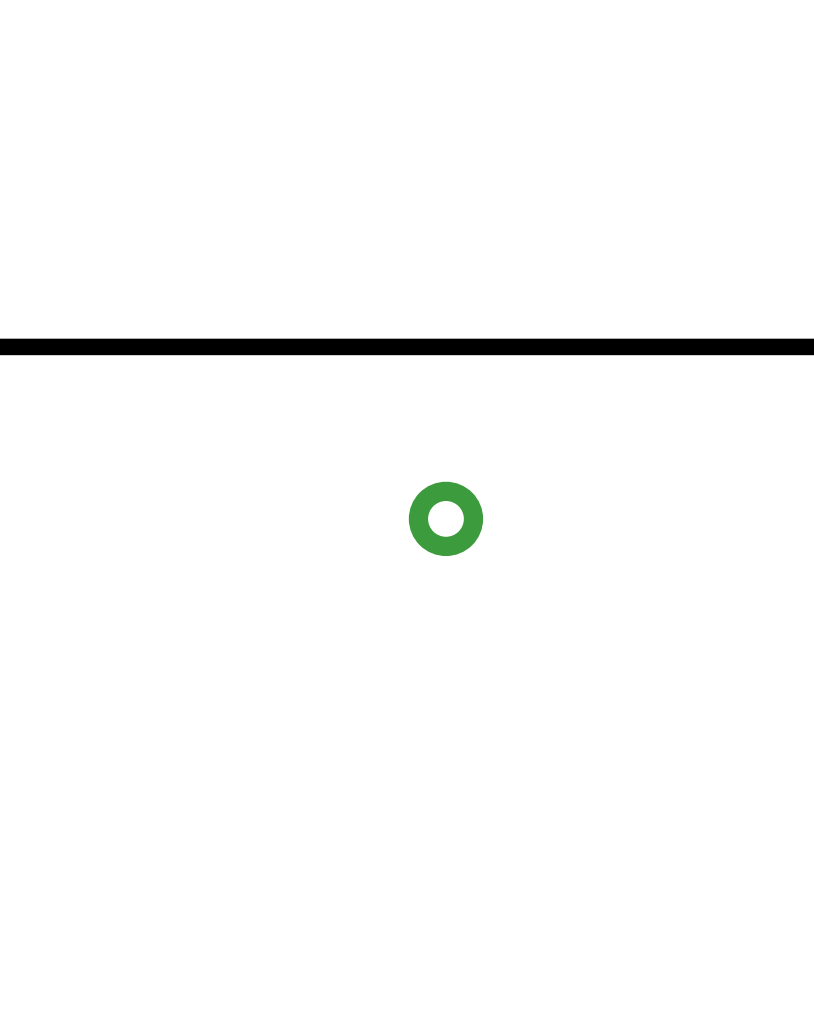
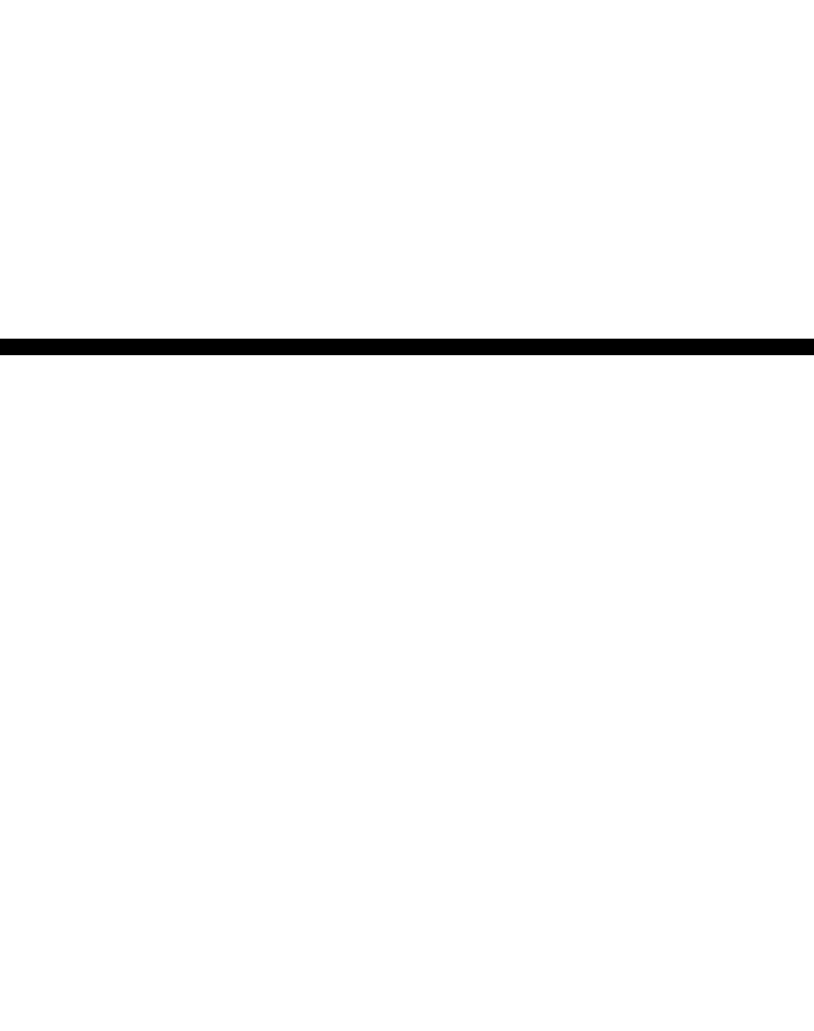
via: (445, 518) -> none

